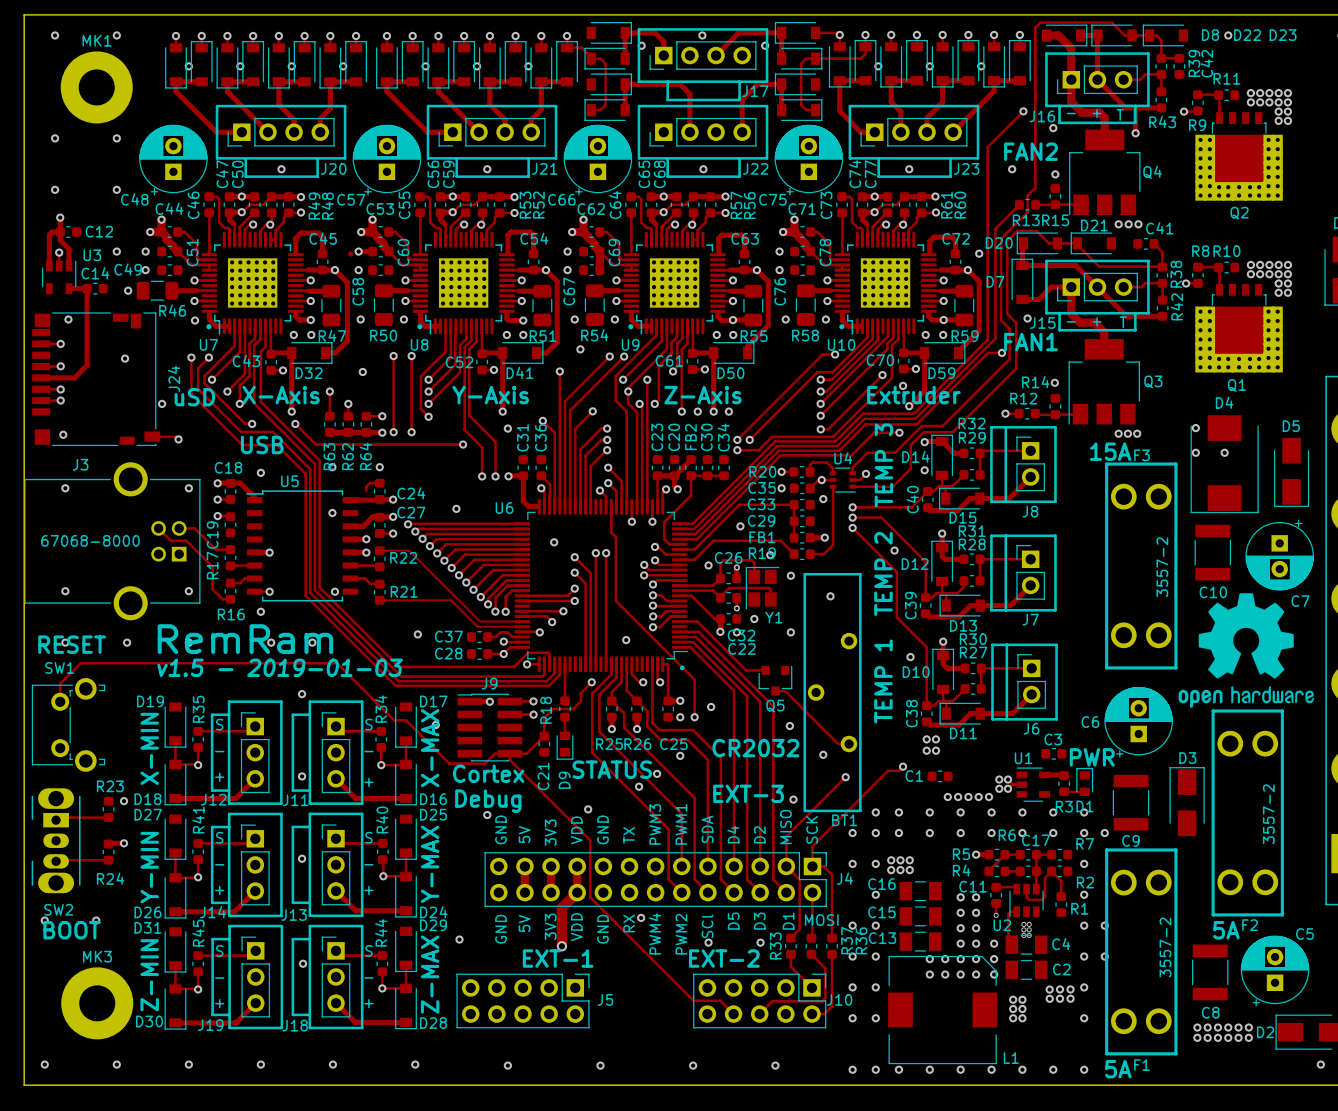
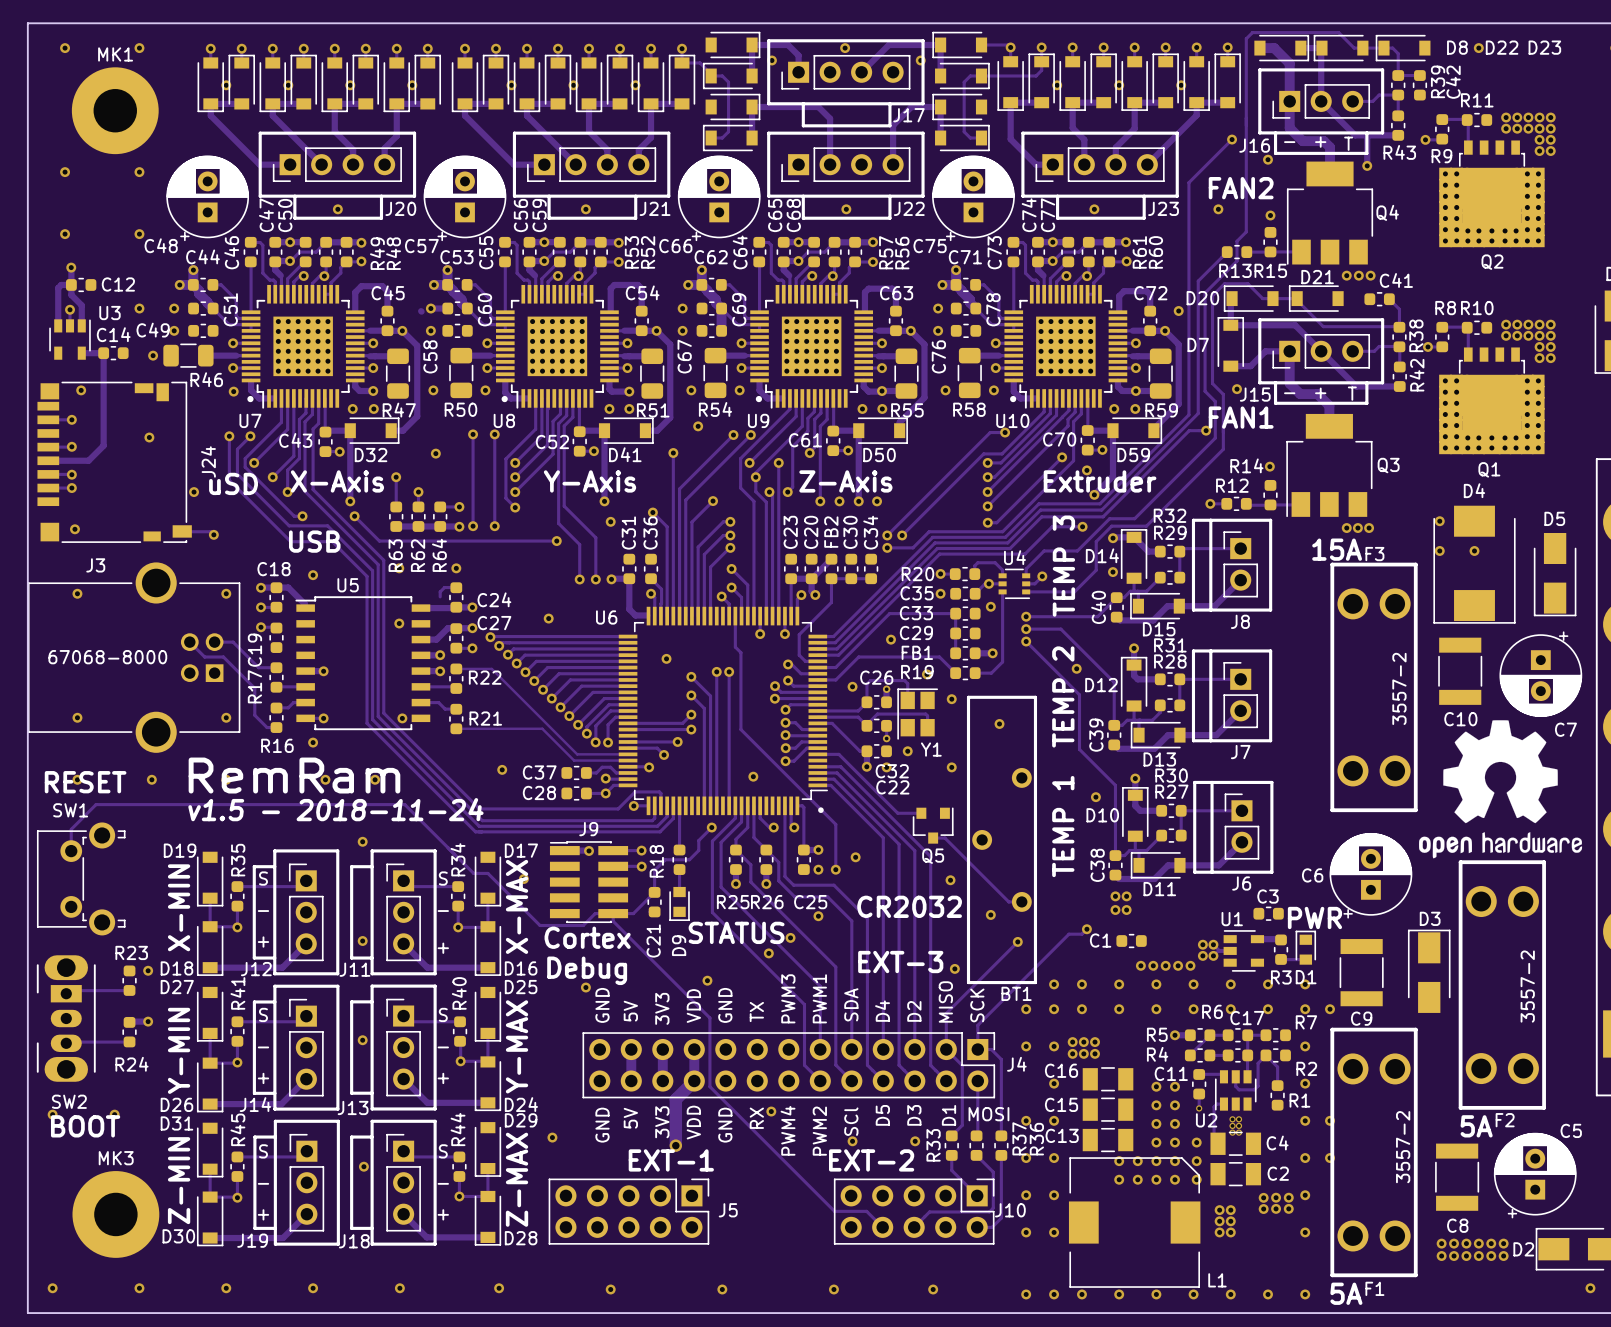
text: v1.5 - 2019-01-03 (280, 667) -> v1.5 - 2018-11-24 (335, 809)

